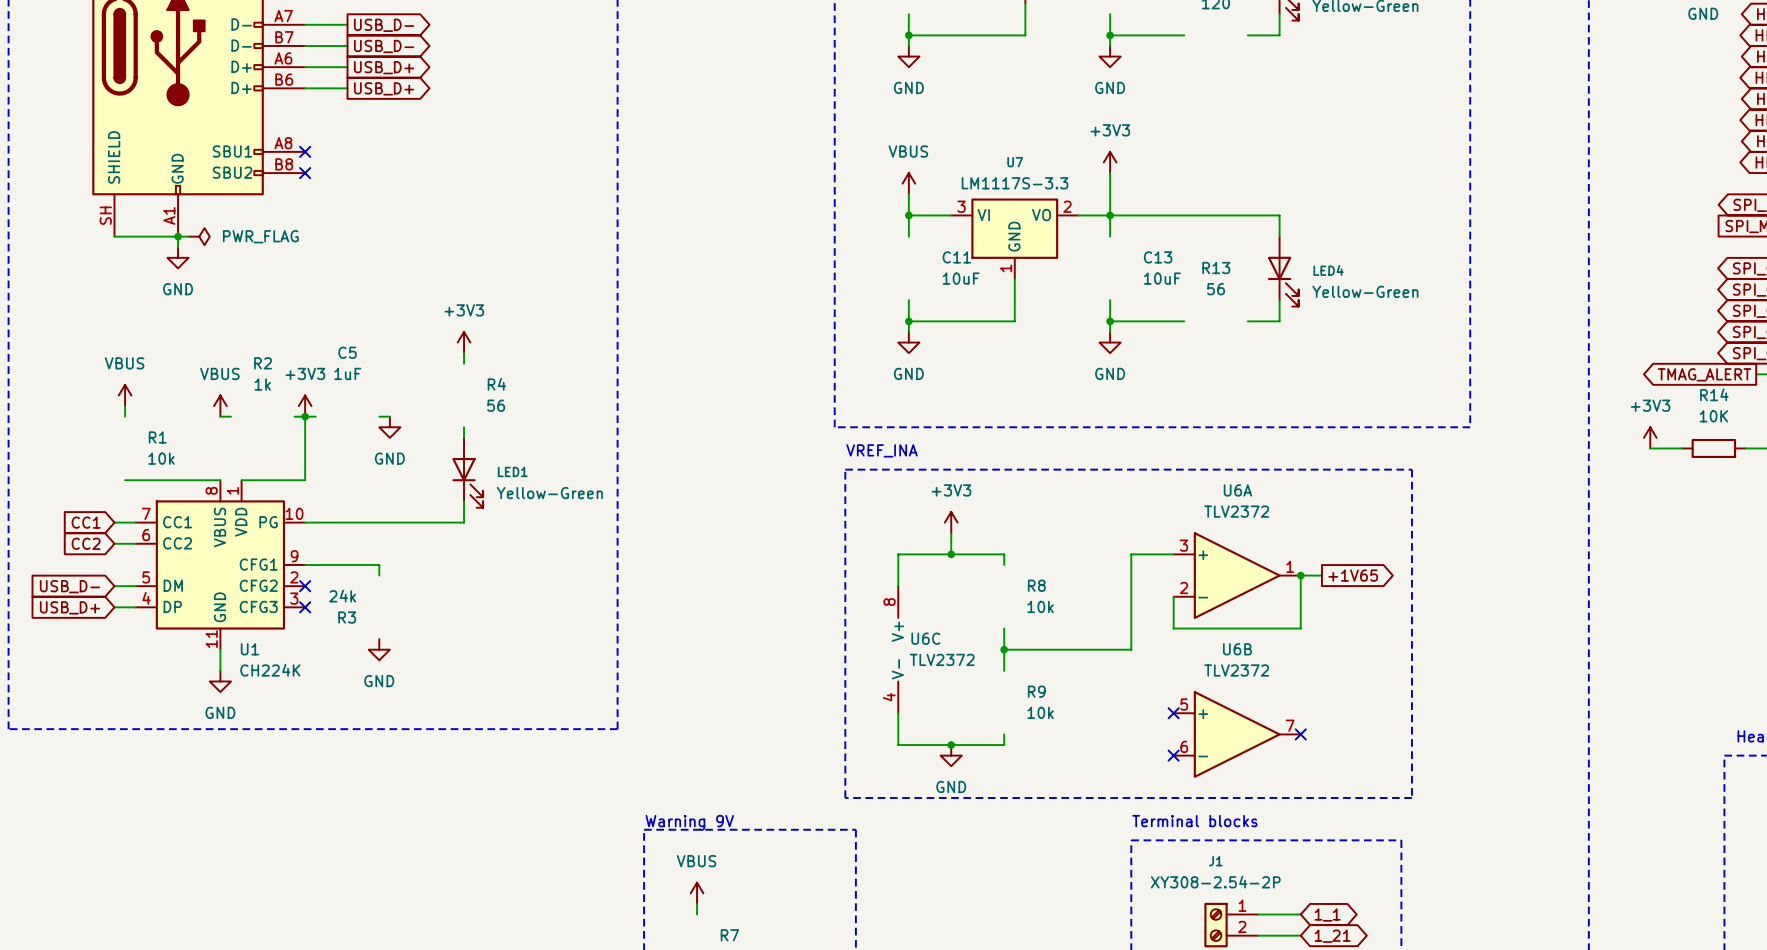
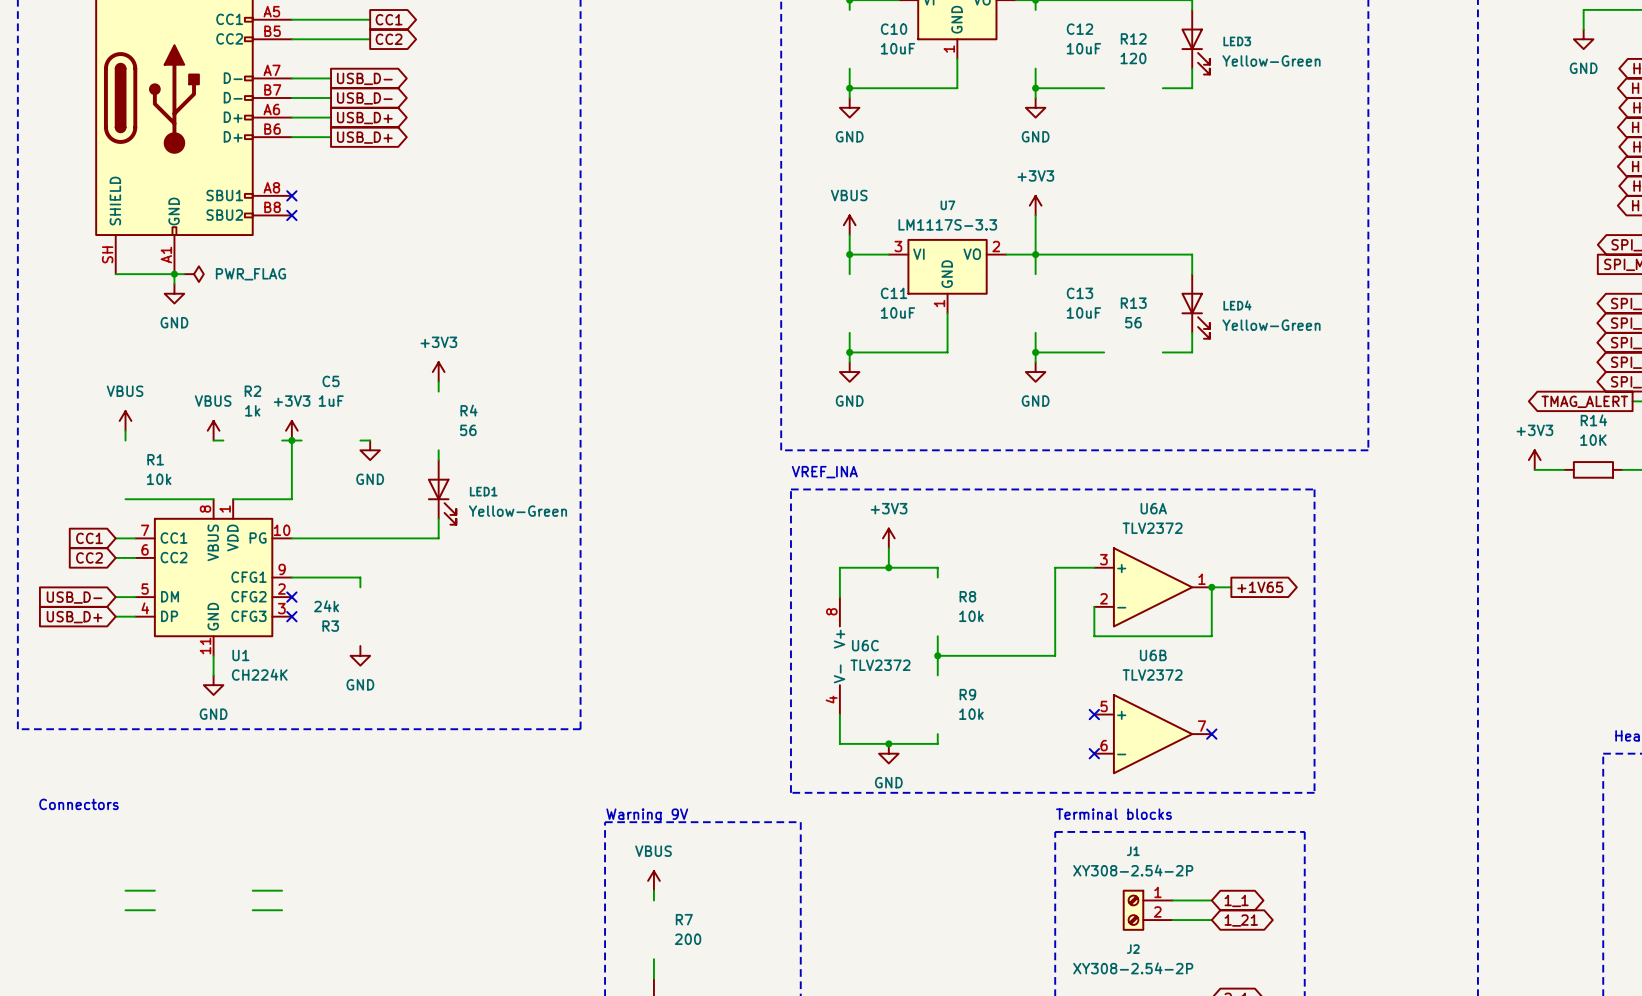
text: none -> Connectors (78, 804)
wire: none -> (125, 890) (154, 890)
wire: none -> (252, 890) (282, 890)
wire: none -> (125, 910) (154, 910)
wire: none -> (252, 910) (282, 910)

